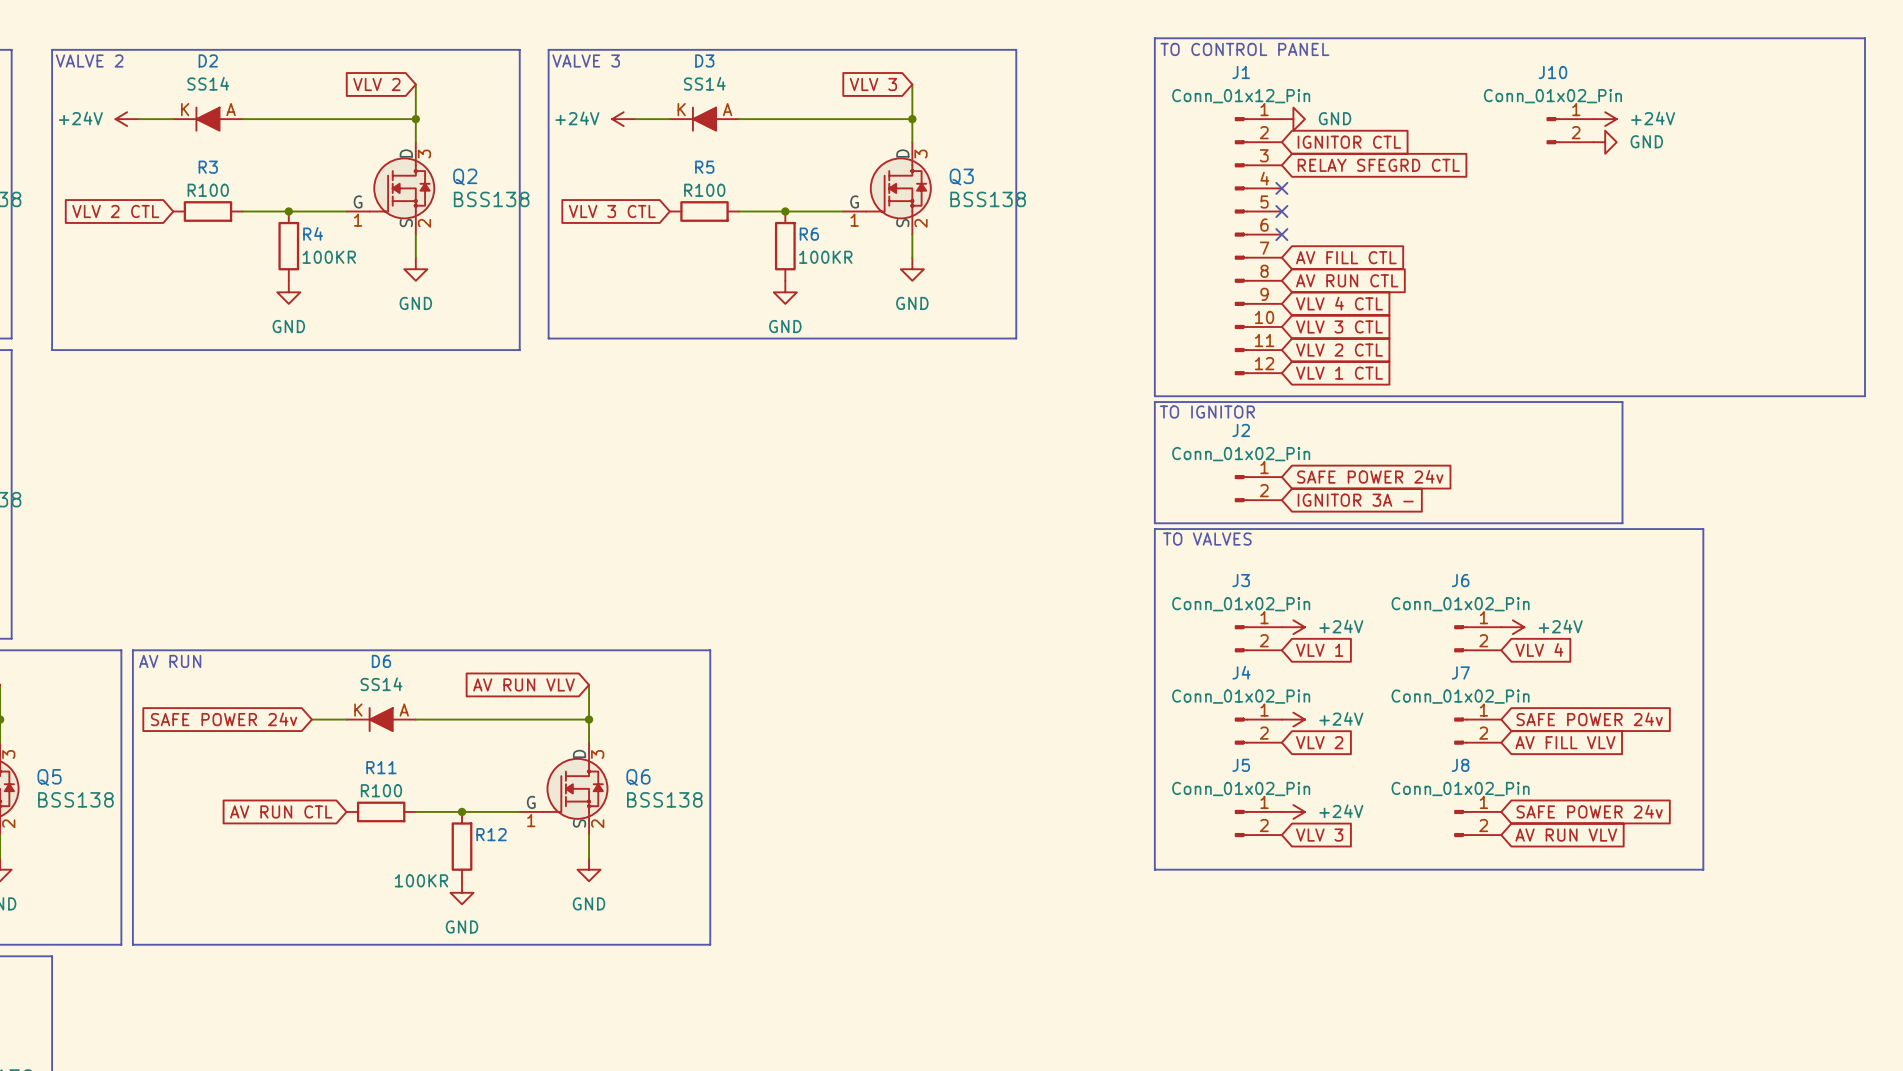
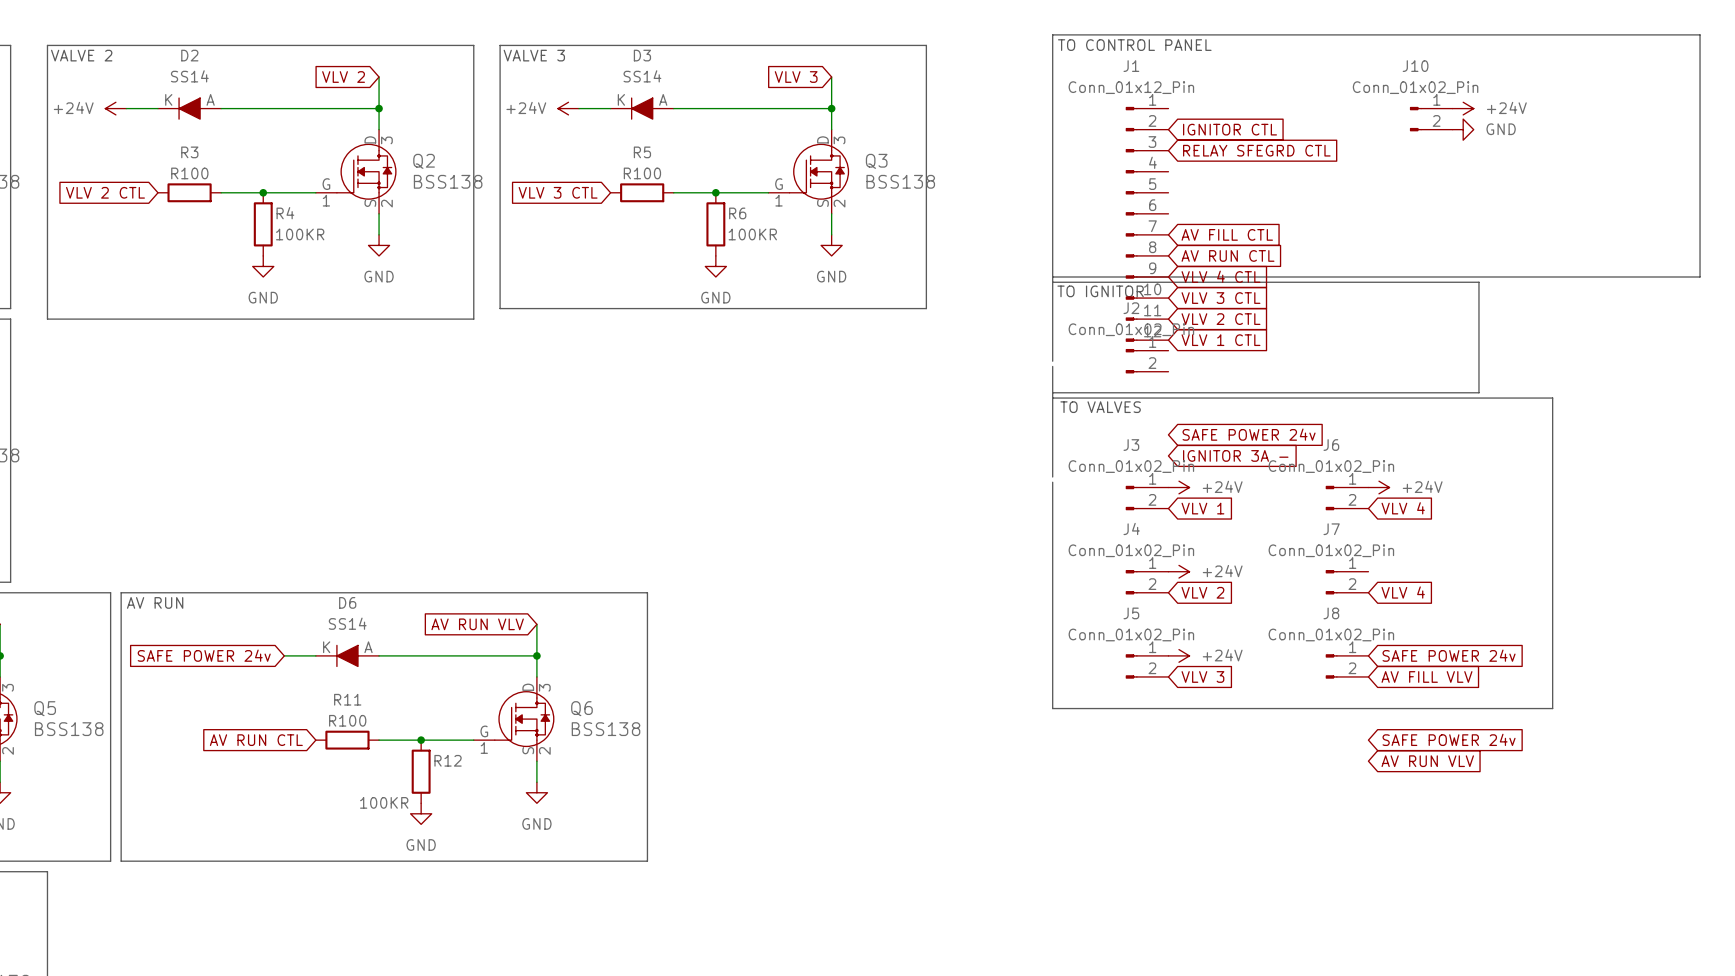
power symbol: GND (1293, 119) -> none
no-connect mark: (1281, 188) -> none
no-connect mark: (1281, 211) -> none
no-connect mark: (1281, 234) -> none
line: (1865, 303) (1865, 396) (1154, 396) -> (1700, 277) (1052, 277)
line: (1154, 402) (1622, 402) -> (1052, 282) (1478, 282) (1478, 366)
text position: TO IGNITOR (1207, 412) -> TO IGNITOR (1100, 291)
line: (1622, 430) (1622, 523) (1154, 523) -> (1478, 392) (1052, 392)
J2 position: (1258, 488) -> (1147, 361)
line: (1154, 529) (1703, 529) -> (1052, 398) (1552, 398) (1552, 482)
power symbol: none -> +24V (1178, 487)
text position: TO VALVES (1207, 539) -> TO VALVES (1100, 407)
J3: none -> Conn_01x02_Pin (1147, 498)
J6: none -> Conn_01x02_Pin (1347, 498)
global label: none -> VLV 1 (1202, 508)
global label: none -> VLV 4 (1403, 508)
J3 name: J3 (1241, 580) -> J4 (1131, 528)
J6 name: J6 (1460, 580) -> J7 (1331, 529)
power symbol position: +24V (1512, 627) -> +24V (1378, 487)
global label: VLV 1 (1319, 650) -> VLV 2 (1202, 592)
J4 name: J4 (1241, 672) -> J5 (1131, 613)
J7 name: J7 (1460, 672) -> J8 (1331, 613)
global label: VLV 2 (1319, 742) -> VLV 3 (1202, 676)
line: (1154, 777) (1154, 869) (1703, 869) (1703, 777) -> (1052, 708) (1552, 708)
power symbol: +24V (1293, 811) -> none
J5: Conn_01x02_Pin (1258, 823) -> none
J8: Conn_01x02_Pin (1477, 823) -> none
global label: VLV 3 (1319, 835) -> none

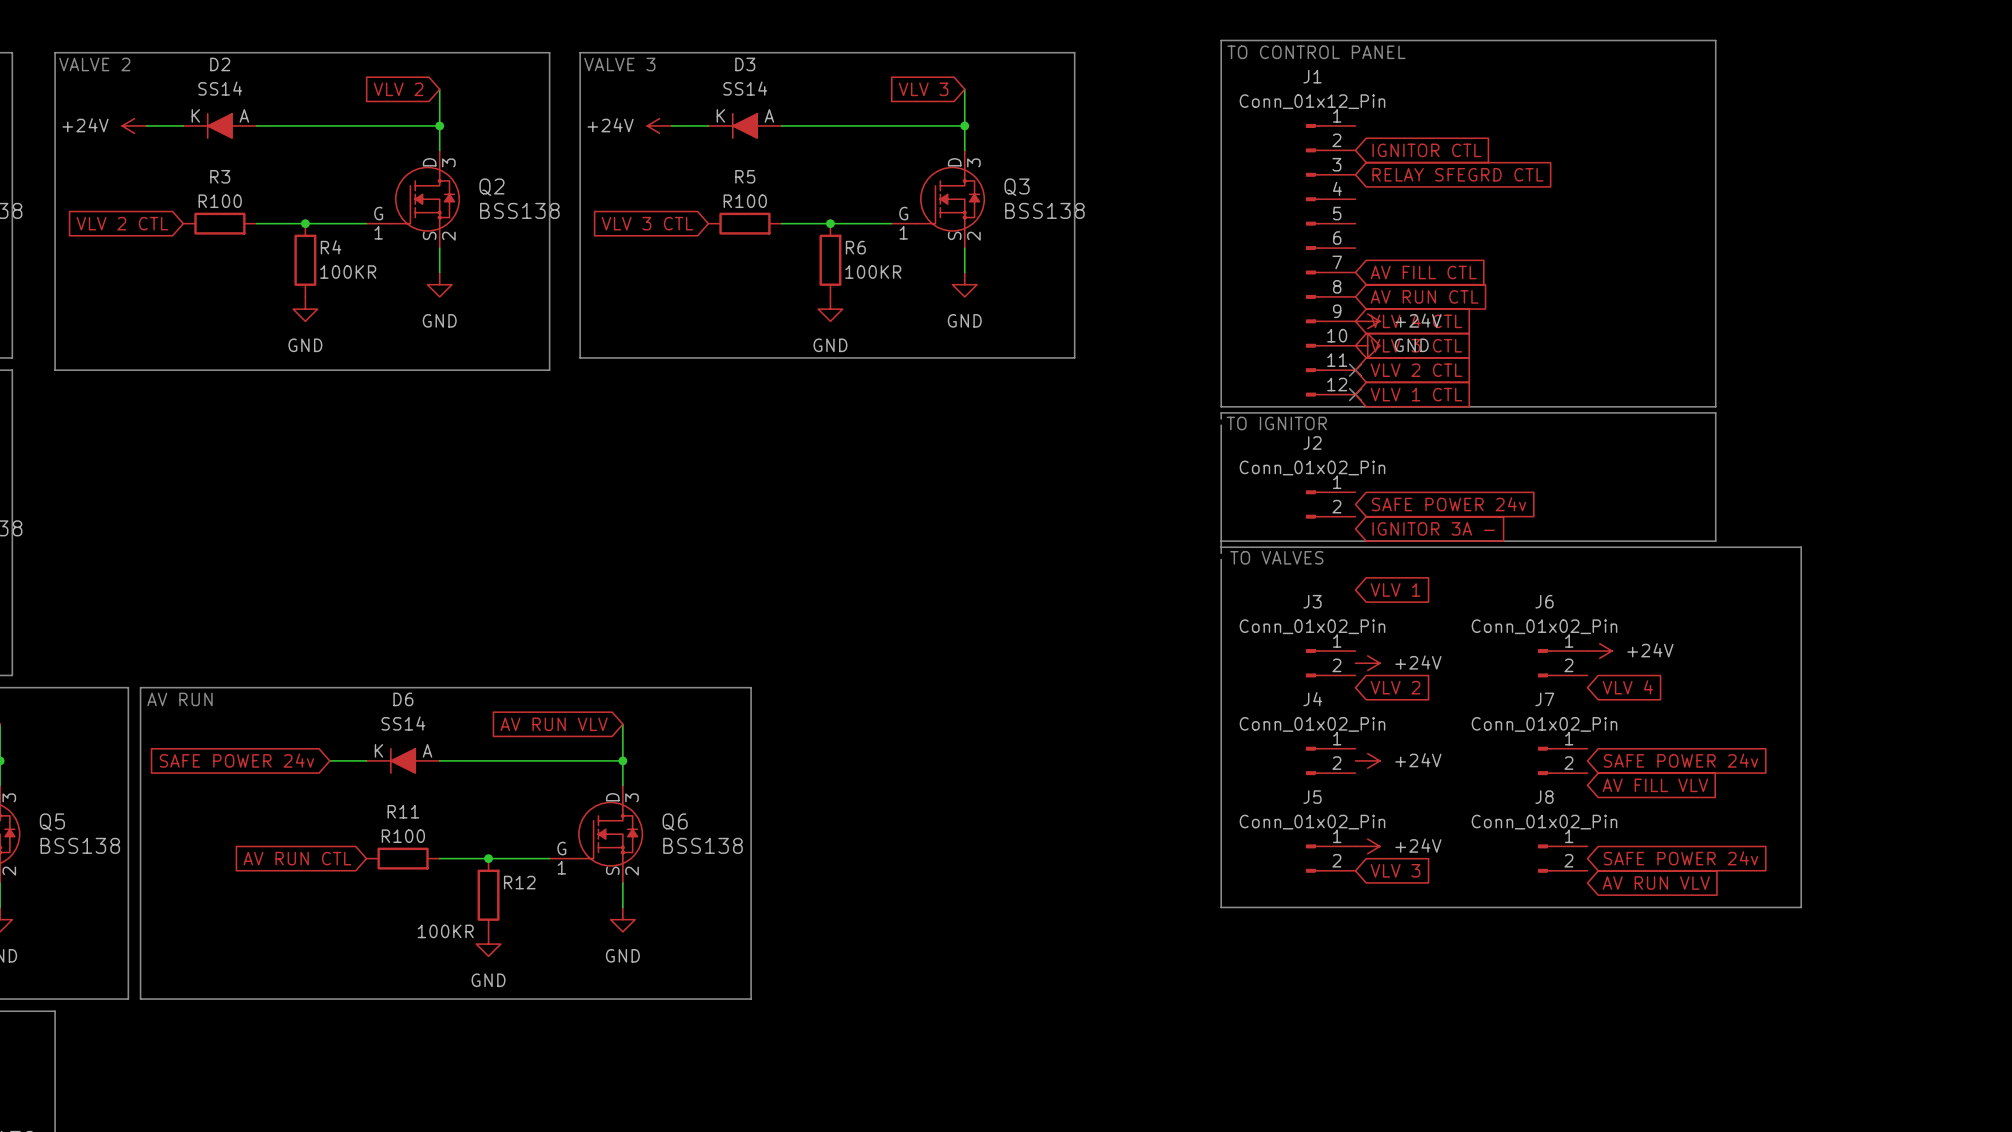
line: (1478, 34) (1700, 34) (1700, 277) (1052, 277) -> (1715, 40) (1715, 327)
power symbol: +24V (1463, 108) -> none
J10: Conn_01x02_Pin (1431, 119) -> none
power symbol: GND (1463, 129) -> none
power symbol: none -> +24V (1367, 321)
line: (1052, 282) (1478, 282) -> none
text position: TO IGNITOR (1100, 291) -> TO IGNITOR (1276, 423)
power symbol: none -> GND (1367, 345)
no-connect mark: none -> (1355, 370)
no-connect mark: none -> (1355, 394)
line: (1052, 350) (1052, 355) -> (1221, 406) (1715, 406)
line: (1478, 350) (1478, 355) -> (1221, 412) (1715, 412)
J2 position: (1147, 361) -> (1330, 504)
line: (1052, 392) (1478, 392) -> (1221, 541) (1715, 541) (1715, 455)
line: (1052, 398) (1552, 398) (1552, 471) -> (1221, 547) (1801, 547)
text position: TO VALVES (1100, 407) -> TO VALVES (1276, 557)
power symbol: +24V (1178, 487) -> none
power symbol position: +24V (1378, 487) -> +24V (1599, 651)
J3 position: (1147, 498) -> (1330, 663)
J6 position: (1347, 498) -> (1562, 663)
global label: VLV 4 (1403, 508) -> none
J4 position: (1147, 582) -> (1330, 760)
J7 position: (1347, 582) -> (1562, 760)
J5 position: (1147, 666) -> (1330, 858)
J8 position: (1347, 666) -> (1562, 858)
global label position: VLV 3 (1202, 676) -> VLV 3 (1395, 870)
line: (1052, 708) (1552, 708) -> (1221, 821) (1221, 907) (1801, 907) (1801, 821)
power symbol: none -> +24V (1367, 846)

